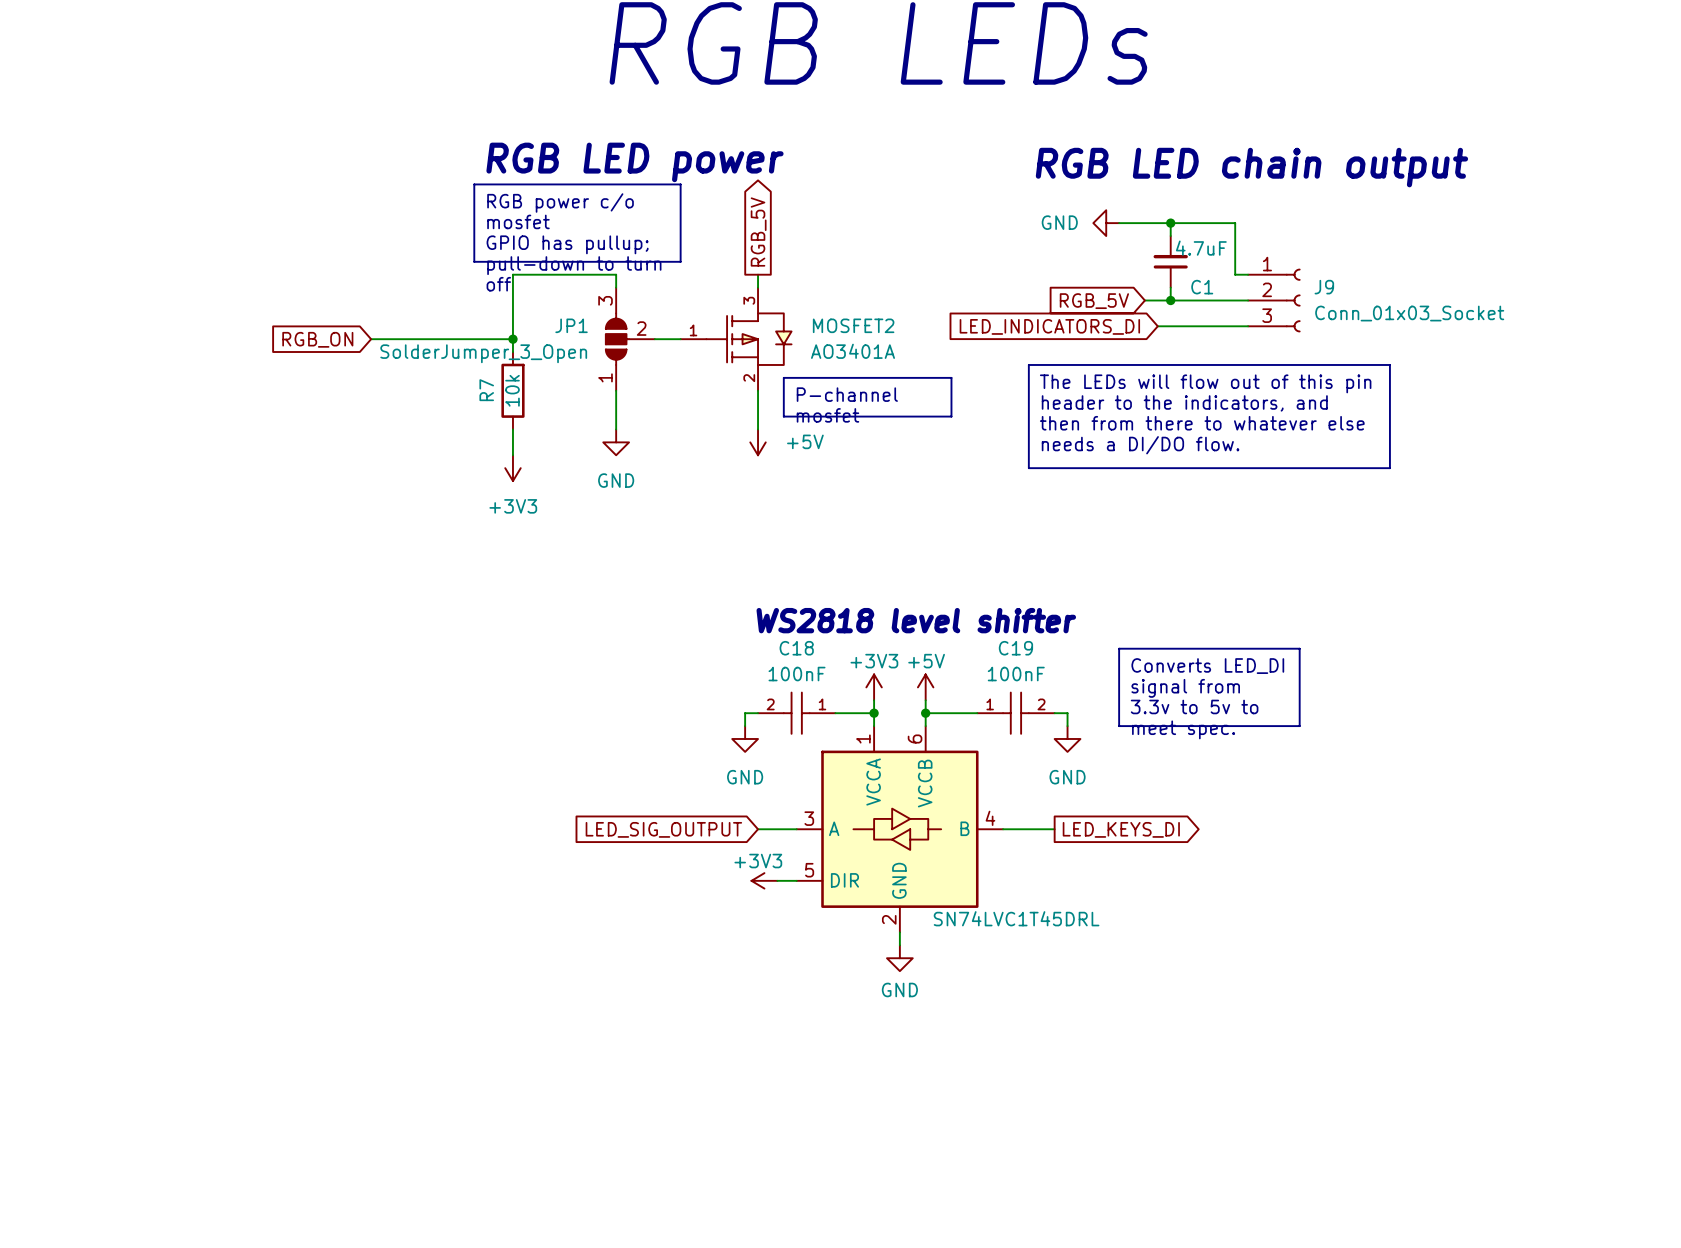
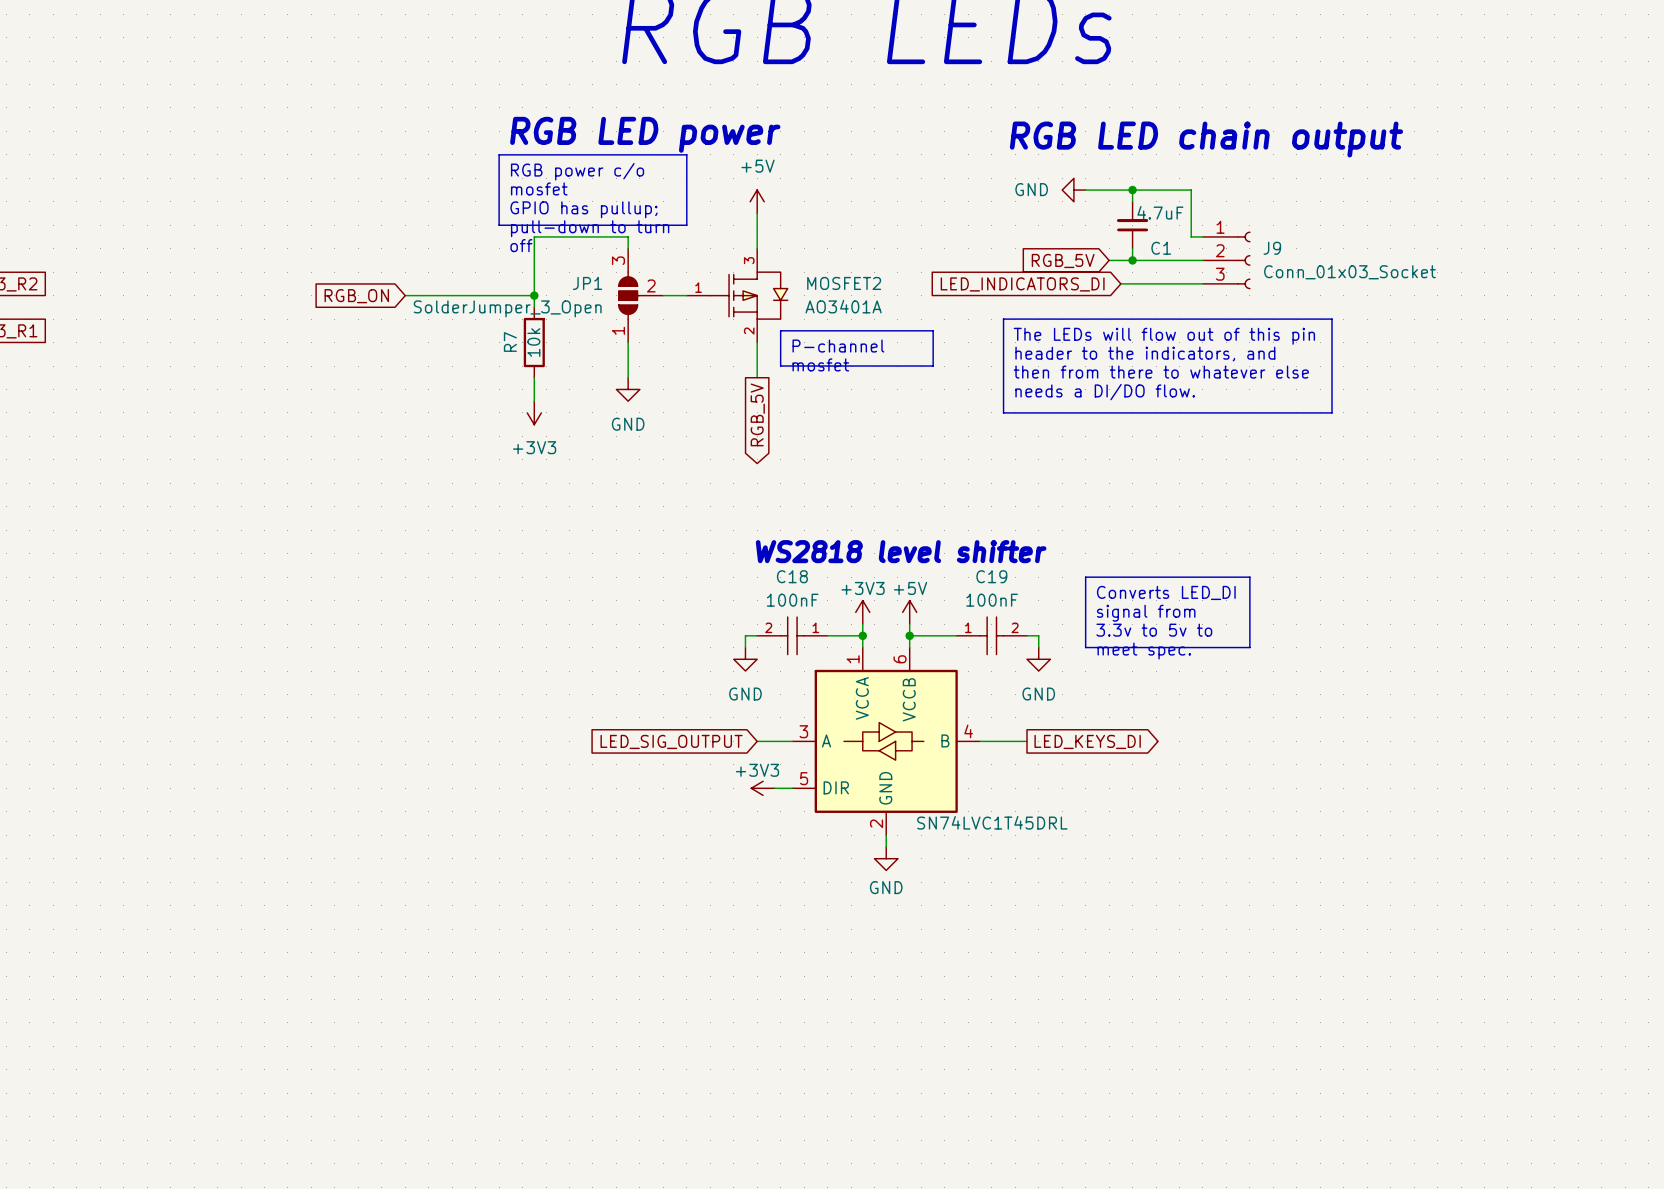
global label rotation: 0° (758, 232) -> 180° (757, 414)
global label position: RGB_5V (758, 232) -> RGB_5V (757, 414)
wire: none -> (757, 213) (757, 236)
power symbol text position: +5V (805, 441) -> +5V (758, 166)
power symbol rotation: 0° (758, 442) -> 180° (757, 201)
power symbol position: +5V (758, 442) -> +5V (757, 201)

